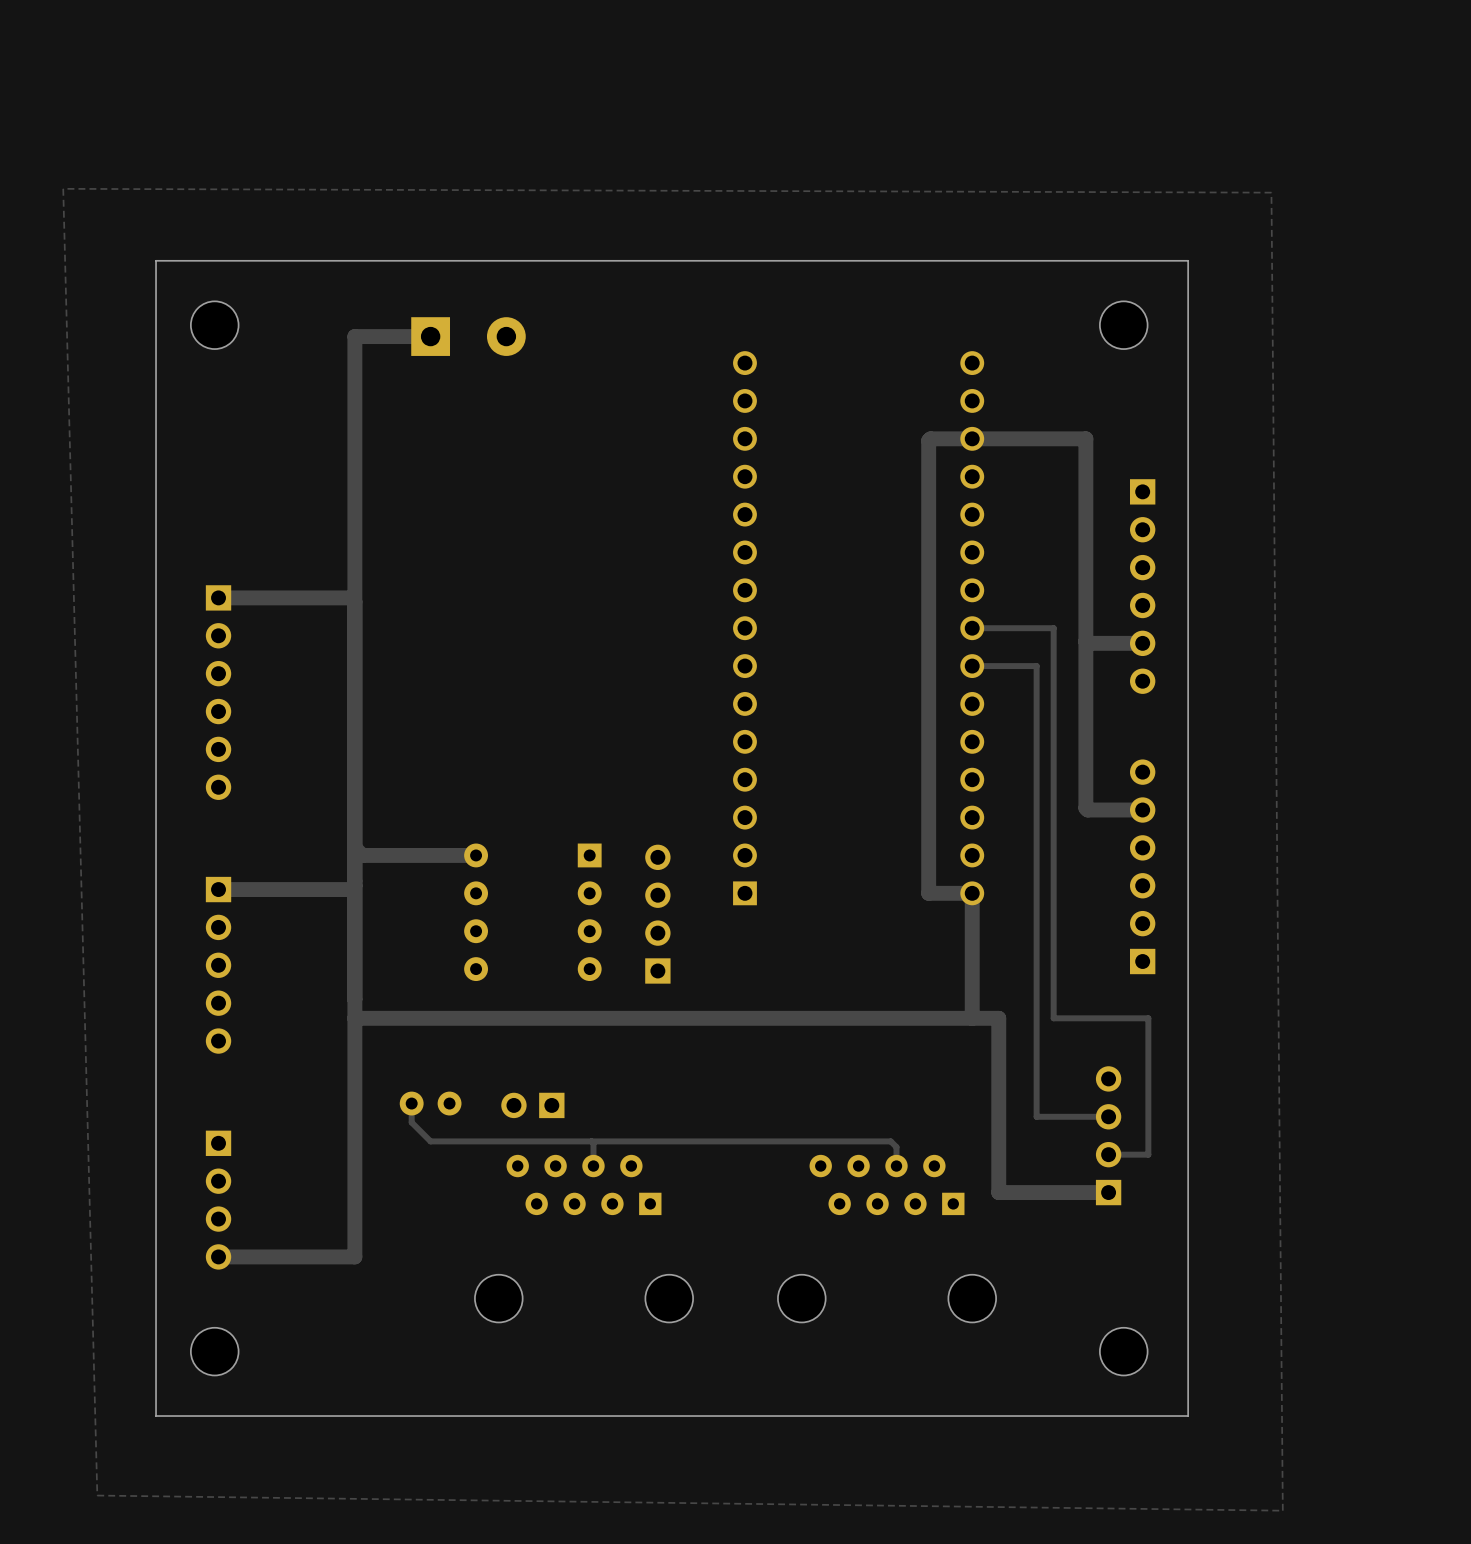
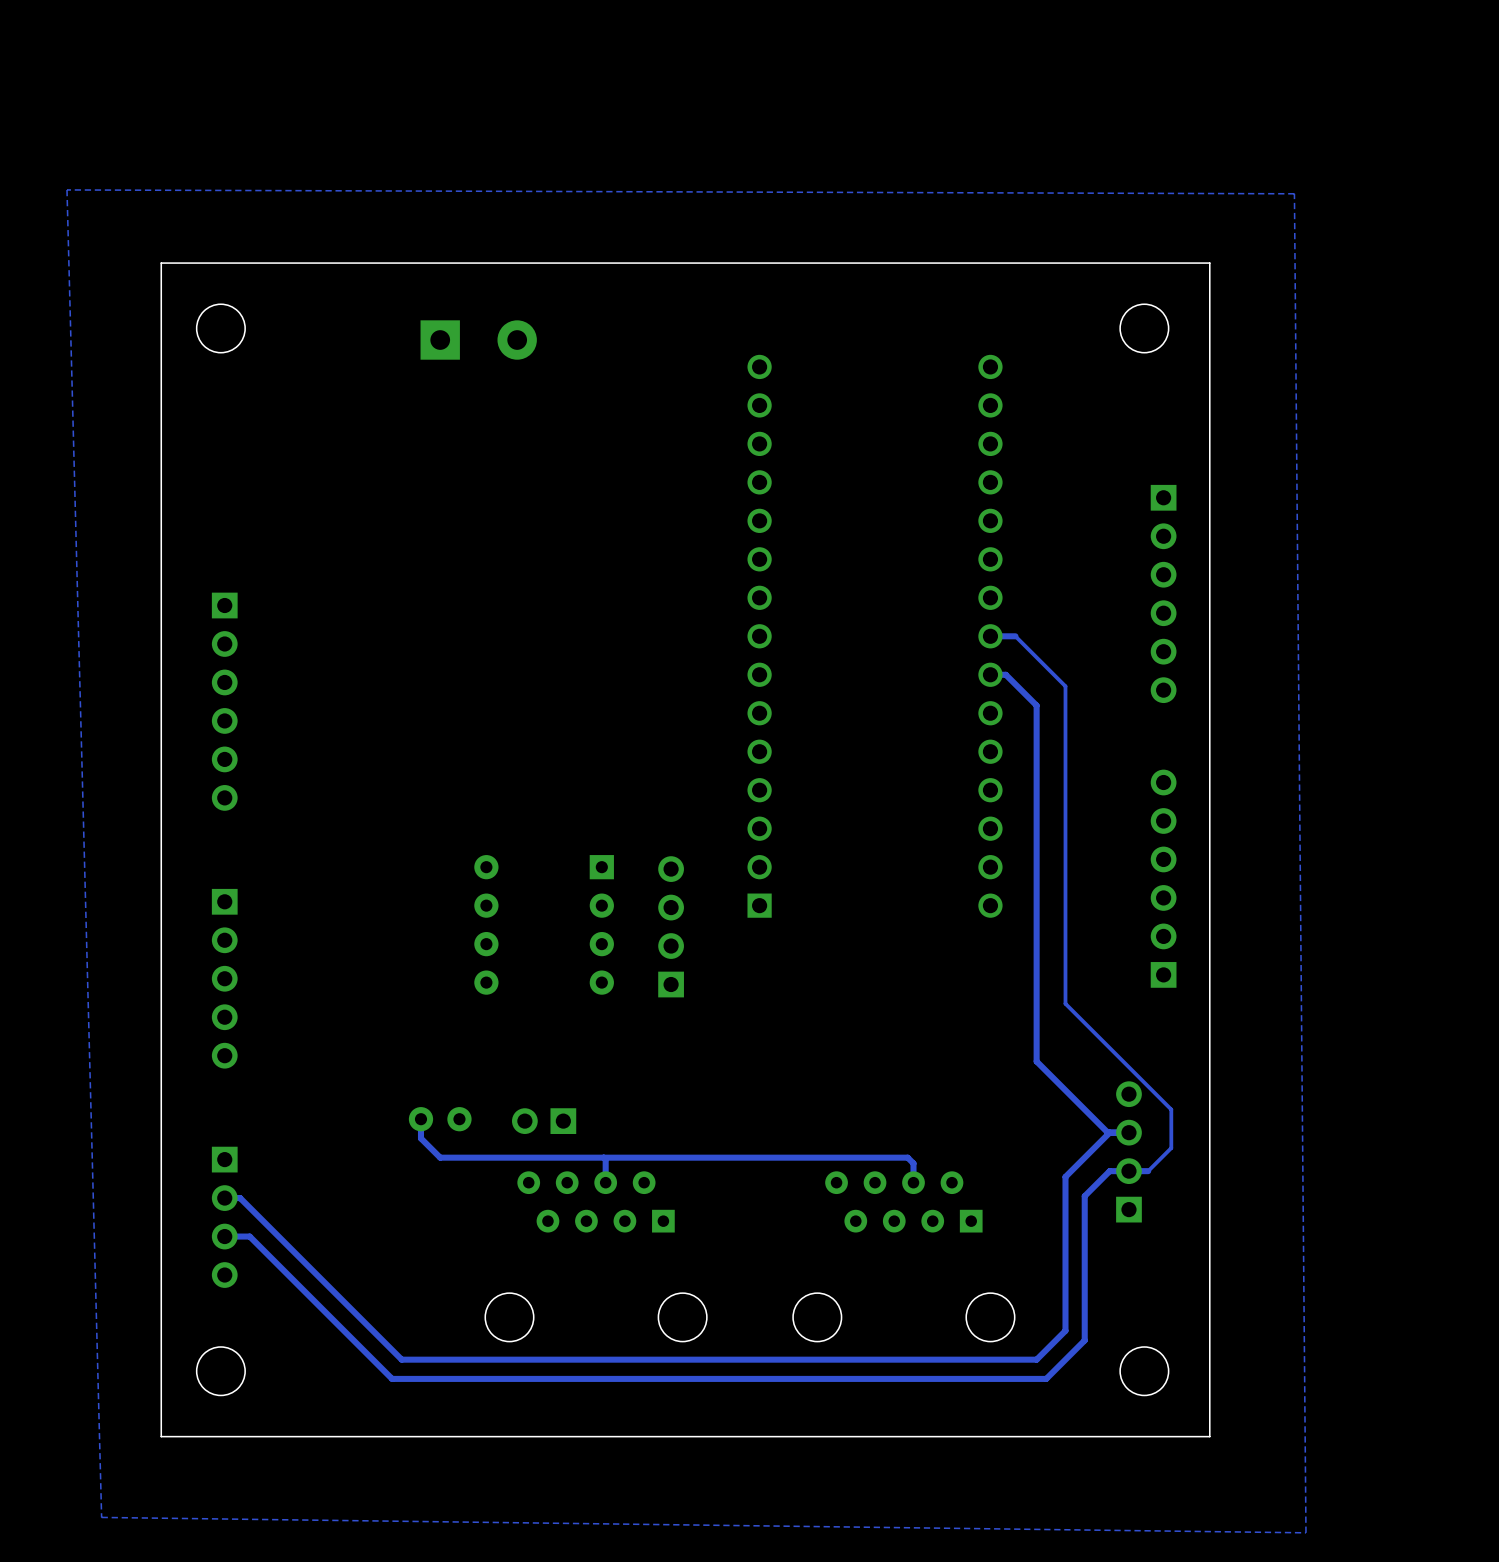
track: (430, 336) (354, 336) (354, 1256) (218, 1256) -> none
track: (218, 597) (351, 597) (354, 601) -> none
track: (996, 628) (1053, 628) (1053, 1018) (1148, 1018) (1148, 1154) (1127, 1154) -> (1015, 636) (1065, 686) (1065, 1003) (1171, 1109) (1171, 1148) (1148, 1171)
track: (1085, 641) (1087, 643) (1142, 643) -> none
track: (987, 666) (1036, 666) (1036, 1116) (1087, 1116) -> (1005, 674) (1036, 705) (1036, 1061) (1107, 1132)
track: (1142, 810) (1087, 810) (1085, 808) (1085, 438) (930, 438) (928, 440) (928, 893) (972, 893) (972, 1018) -> none
track: (354, 847) (362, 855) (476, 855) -> none
track: (354, 885) (351, 889) (218, 889) -> none
track: (354, 1018) (998, 1018) (998, 1192) (1108, 1192) -> none
track: none -> (1109, 1132) (1065, 1176) (1065, 1330) (1036, 1359) (401, 1359) (240, 1198) (224, 1198)
track: none -> (1128, 1171) (1109, 1171) (1084, 1196) (1084, 1340) (1046, 1378) (392, 1378) (249, 1236) (224, 1236)

